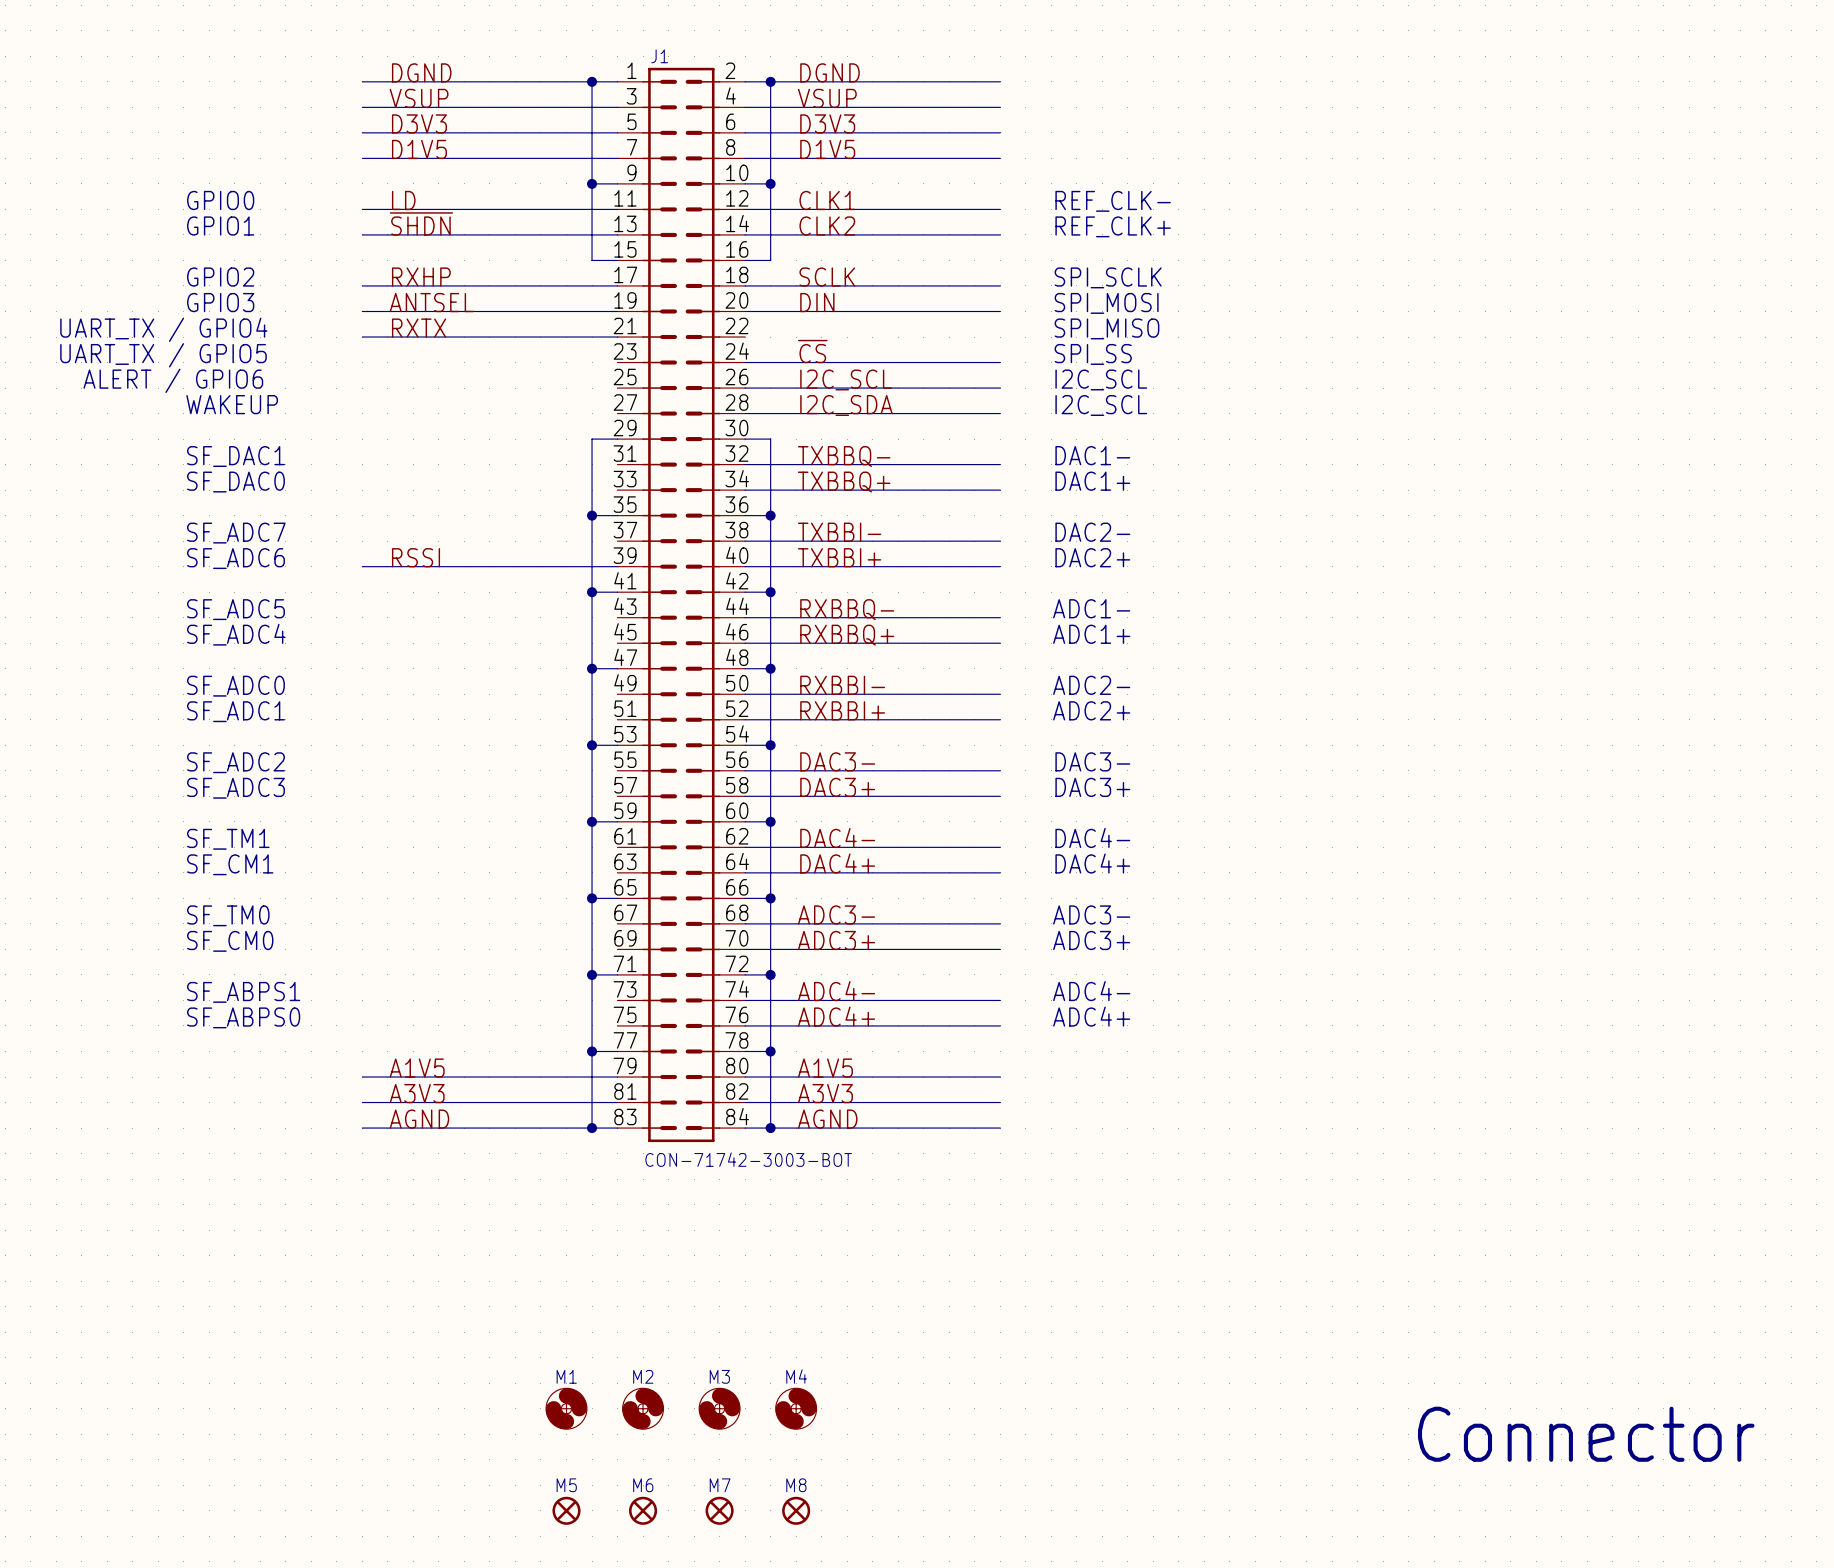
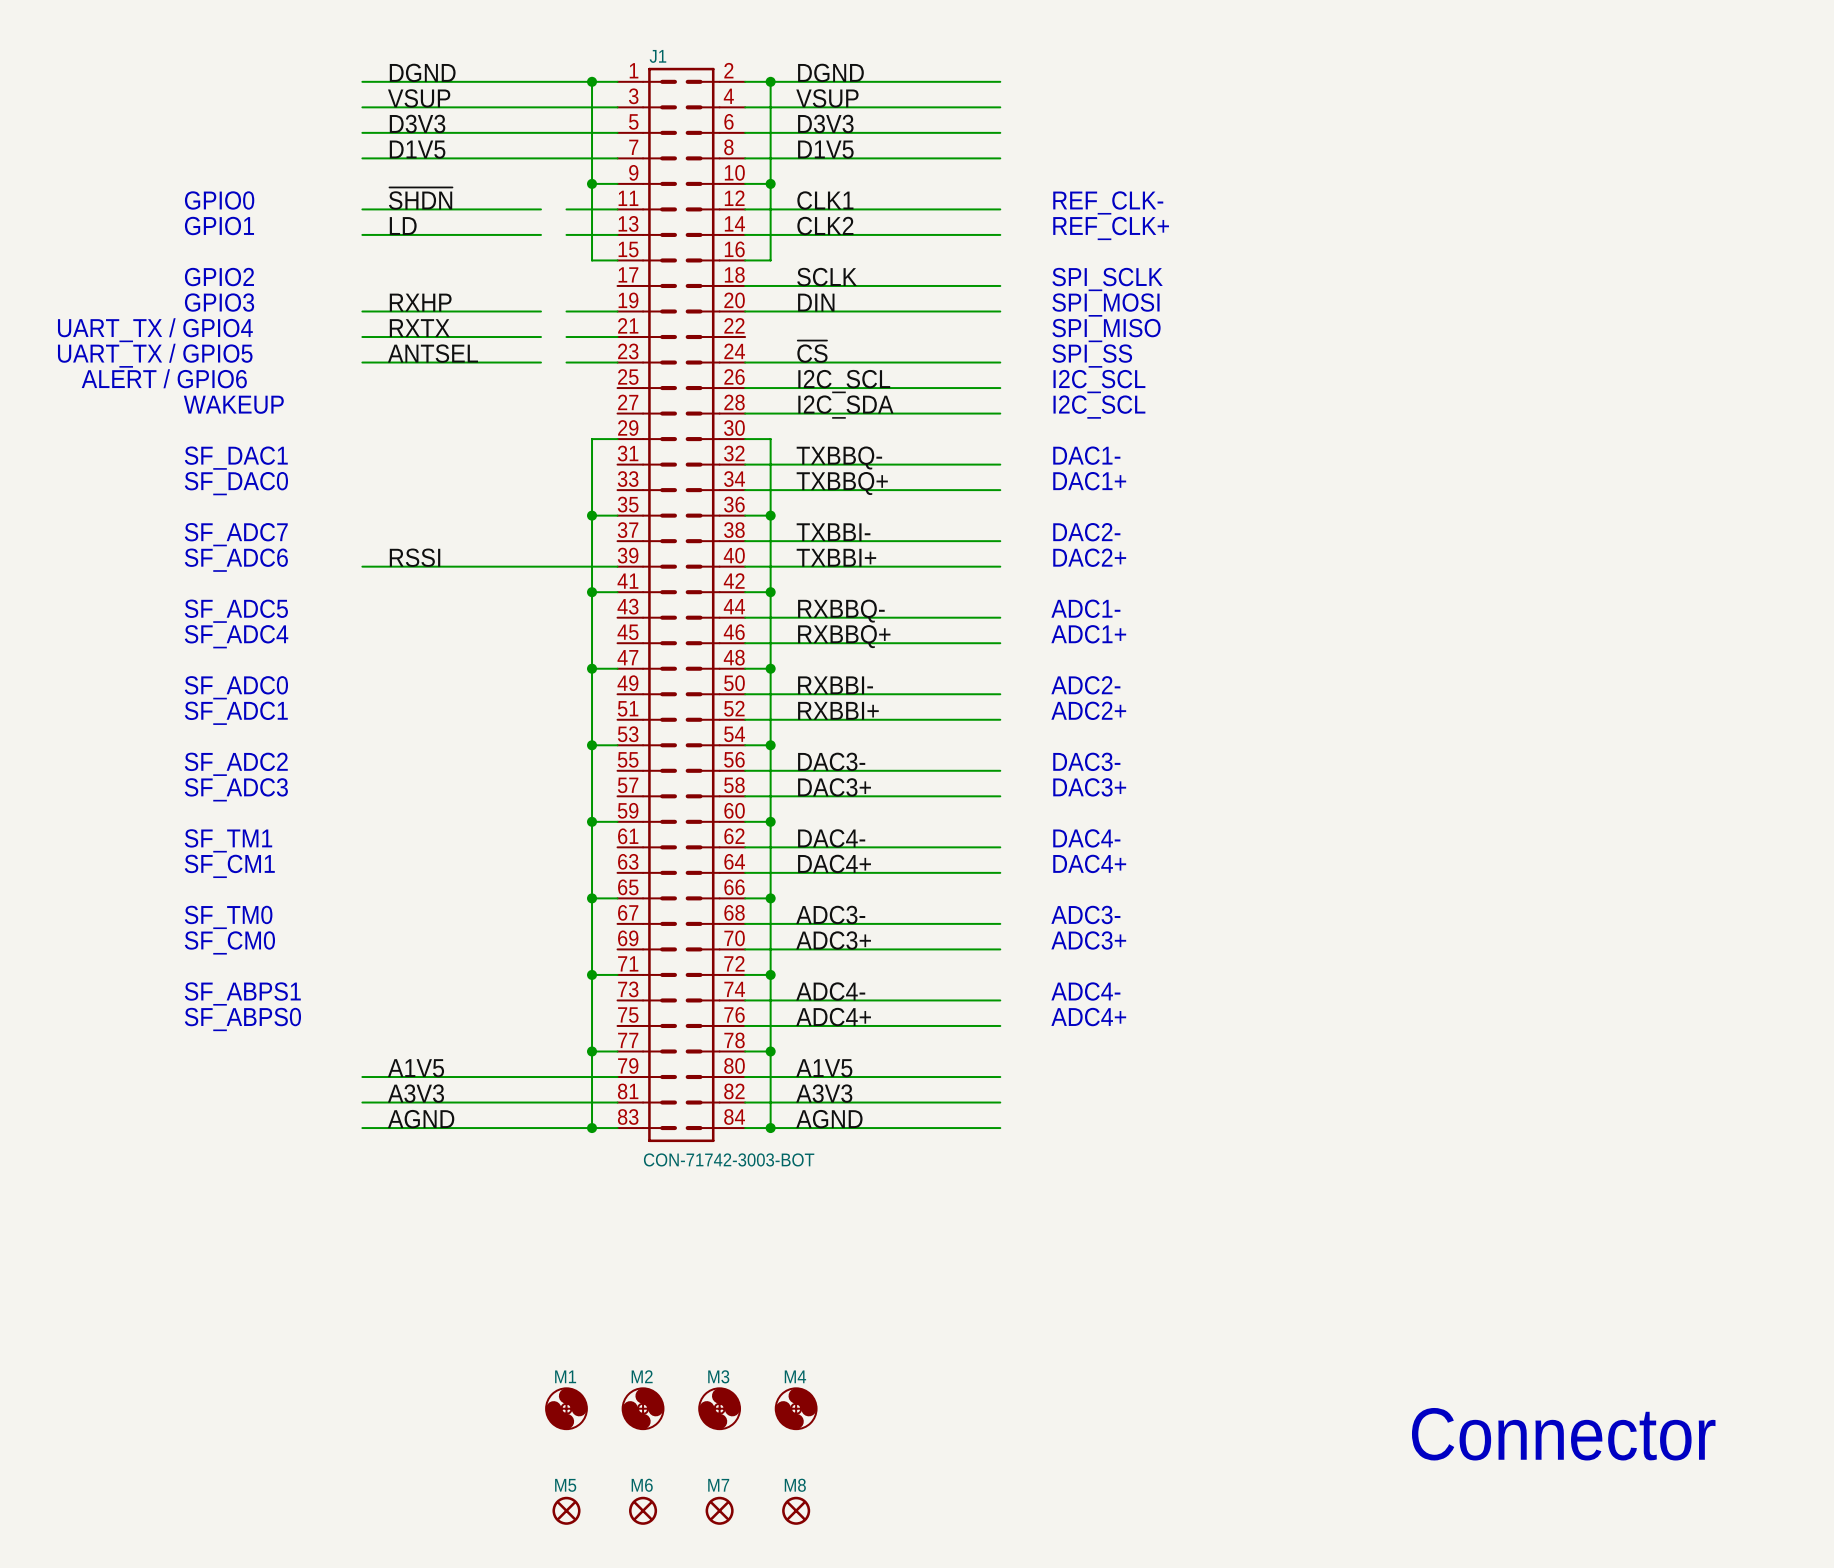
label: LD (403, 200) -> ~{SHDN} (420, 198)
wire: (540, 209) (566, 209) -> none
label: ~{SHDN} (421, 223) -> LD (403, 226)
wire: (540, 234) (566, 234) -> none
label: RXHP (421, 277) -> none
wire: (362, 285) (617, 285) -> none
label: ANTSEL (431, 302) -> RXHP (420, 302)
wire: (540, 311) (566, 311) -> none
wire: (540, 337) (566, 337) -> none
label: none -> ANTSEL (432, 353)
wire: none -> (362, 362) (540, 362)
wire: none -> (566, 362) (617, 362)

